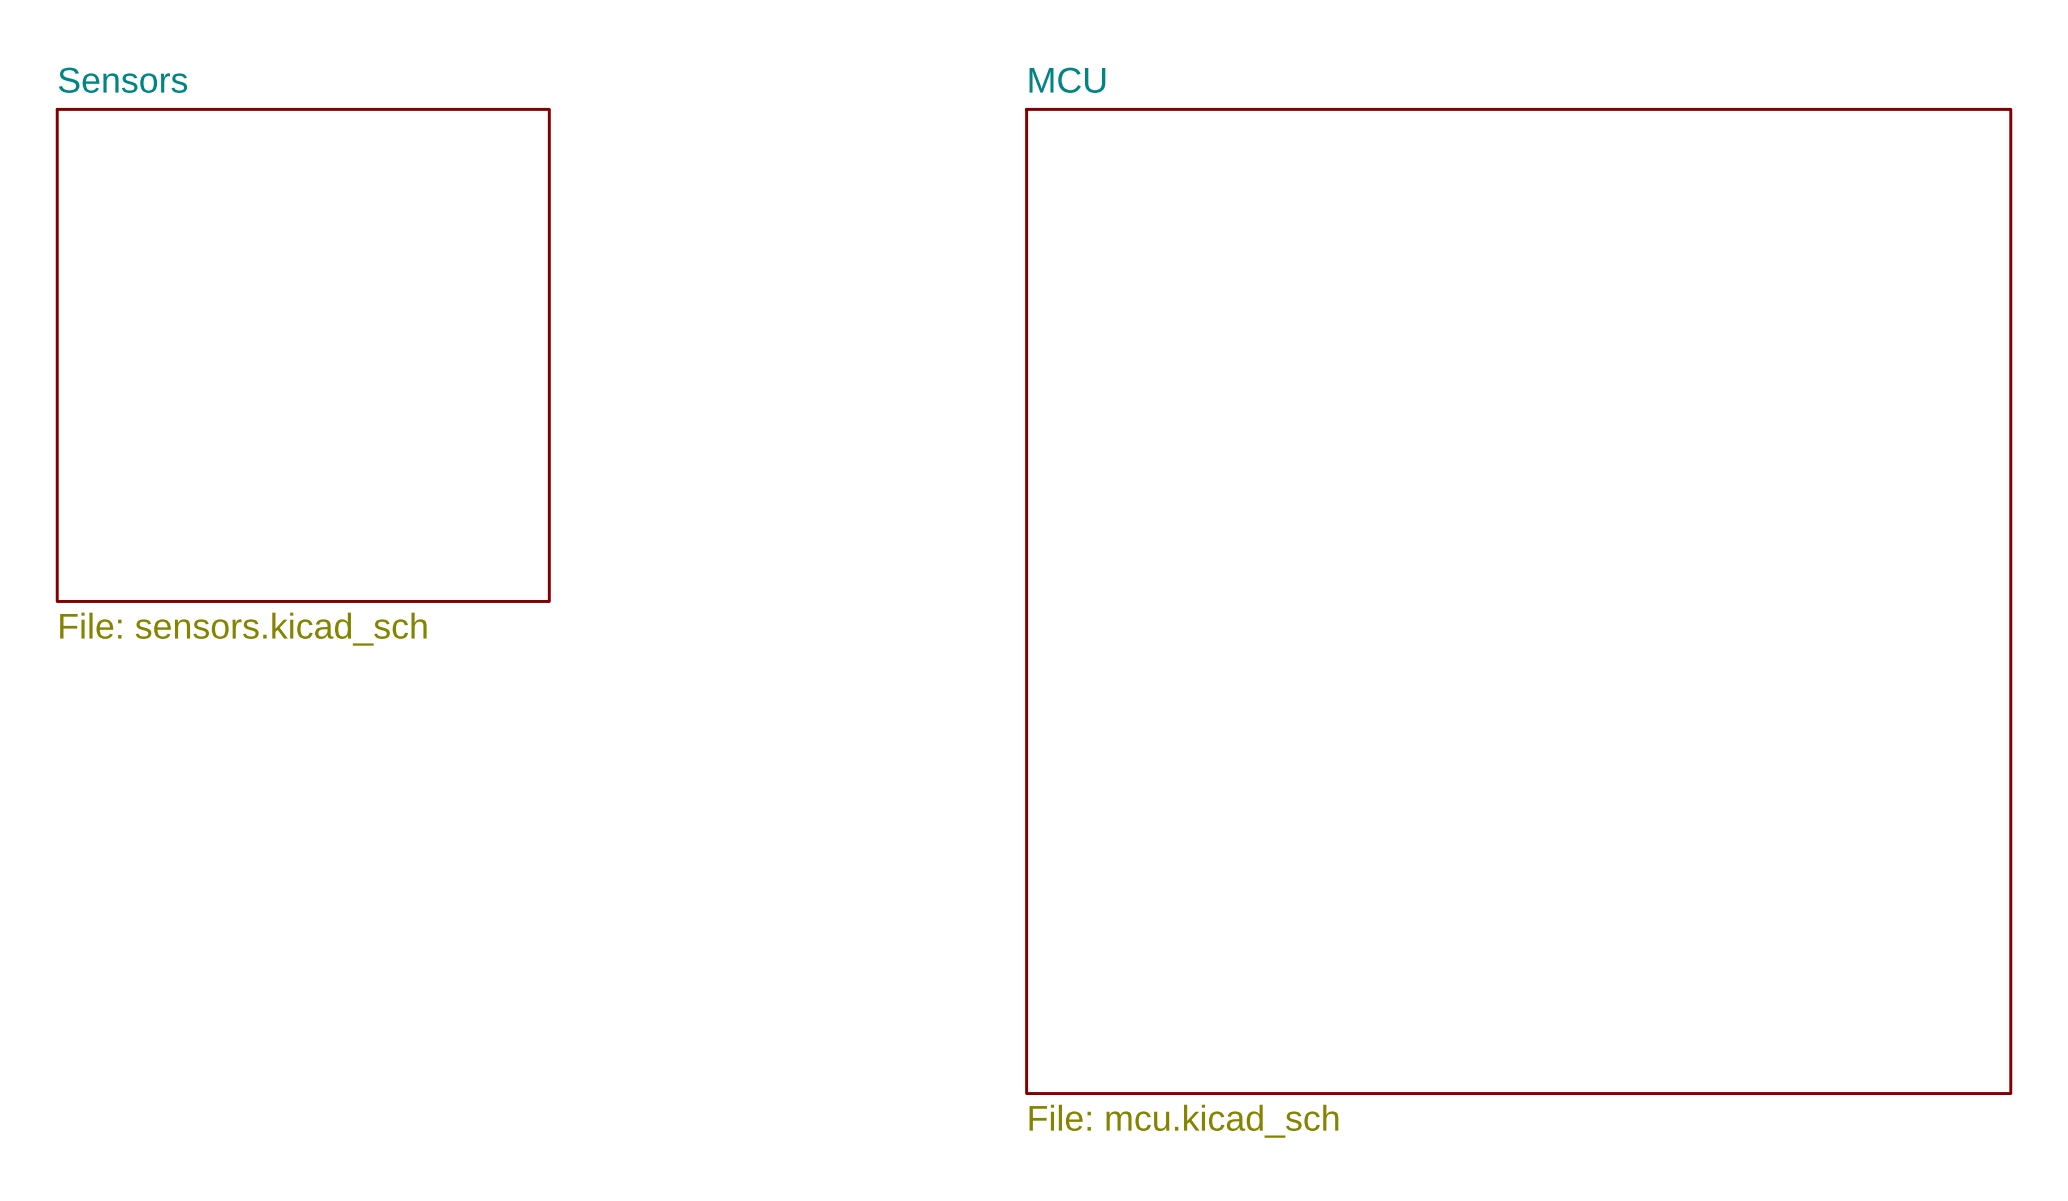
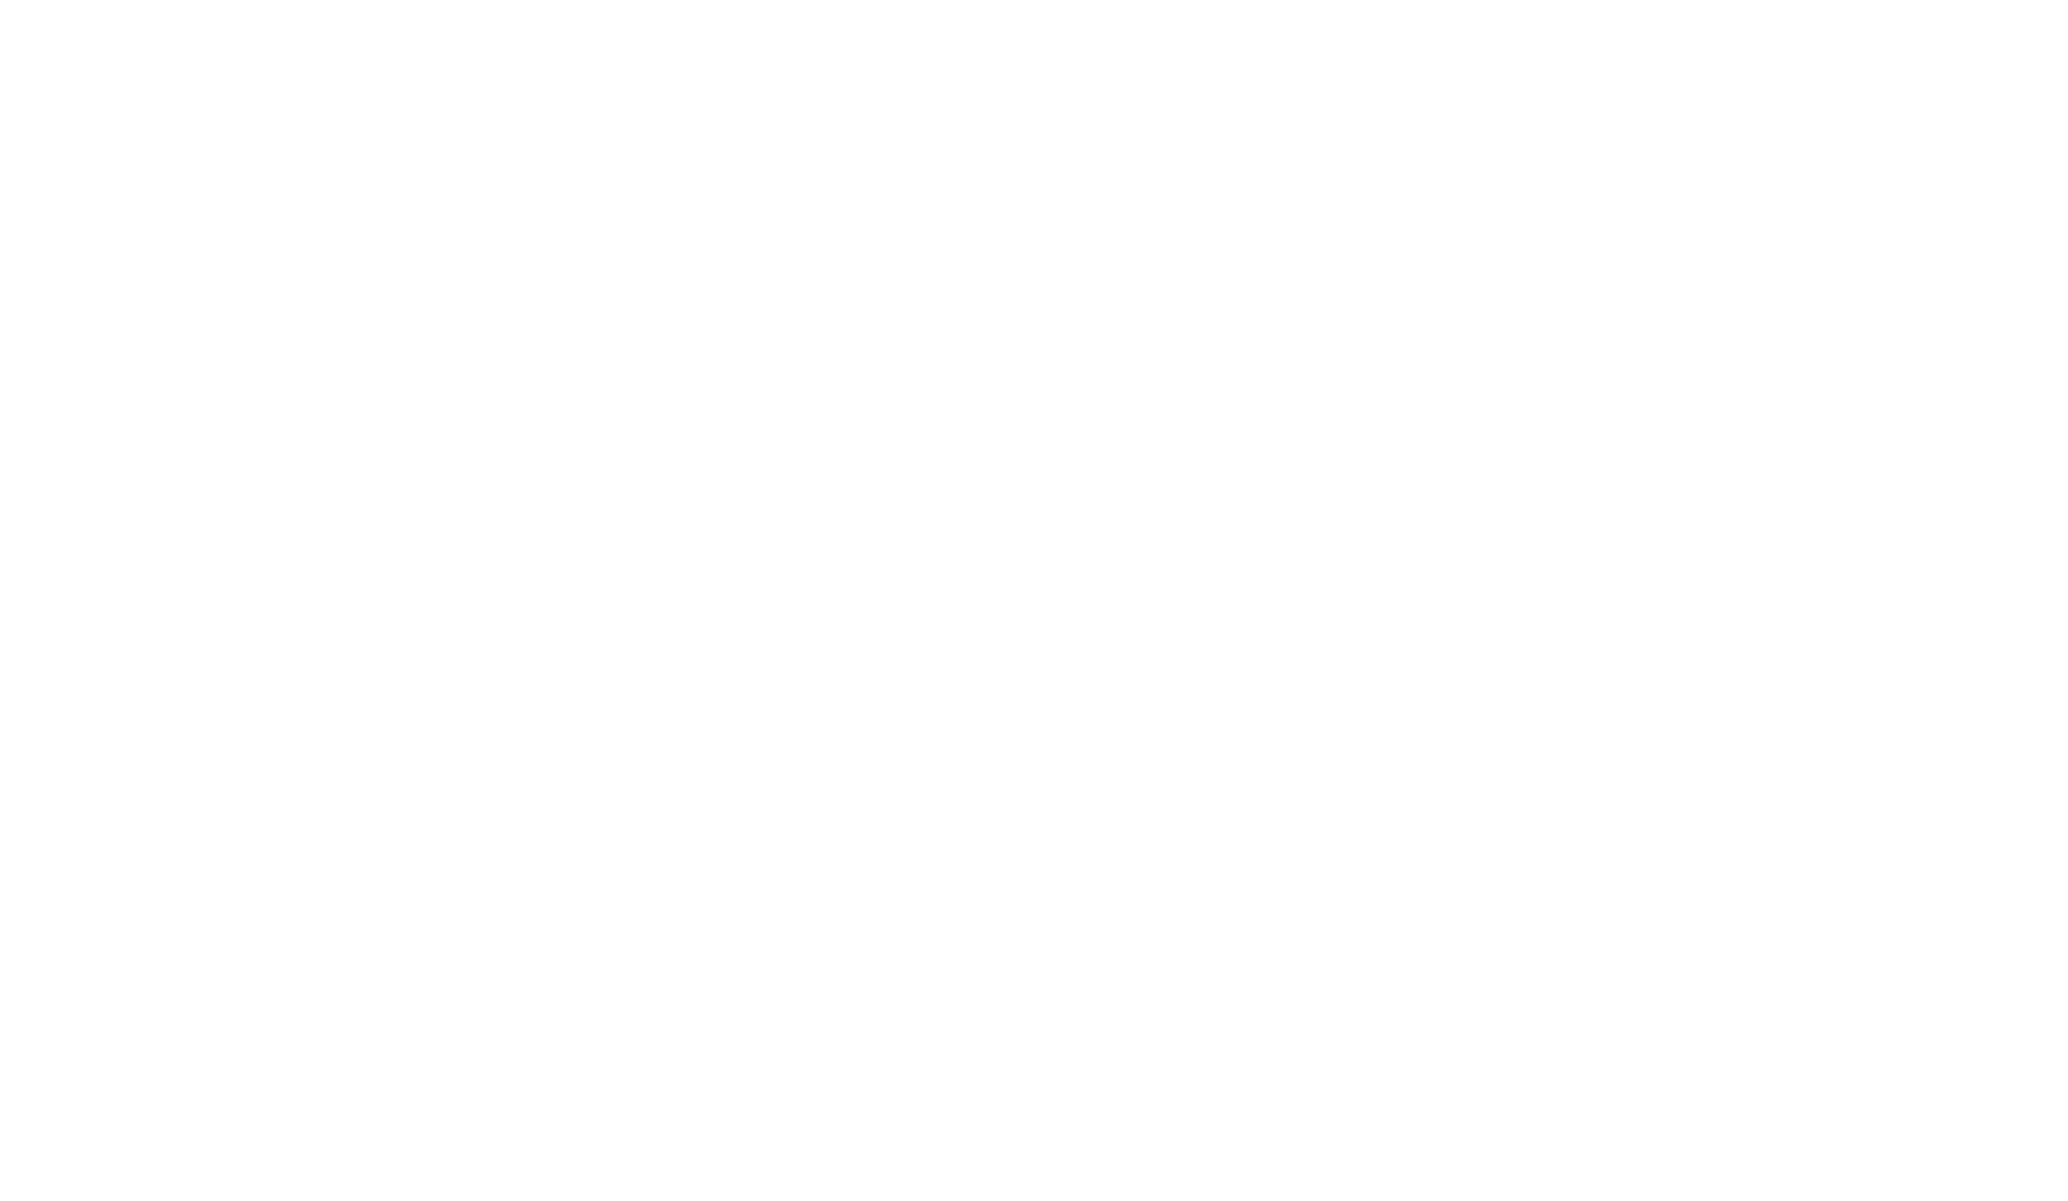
sheet Sensors: File: sensors.kicad_sch (303, 355) -> none
sheet MCU: File: mcu.kicad_sch (1518, 601) -> none

